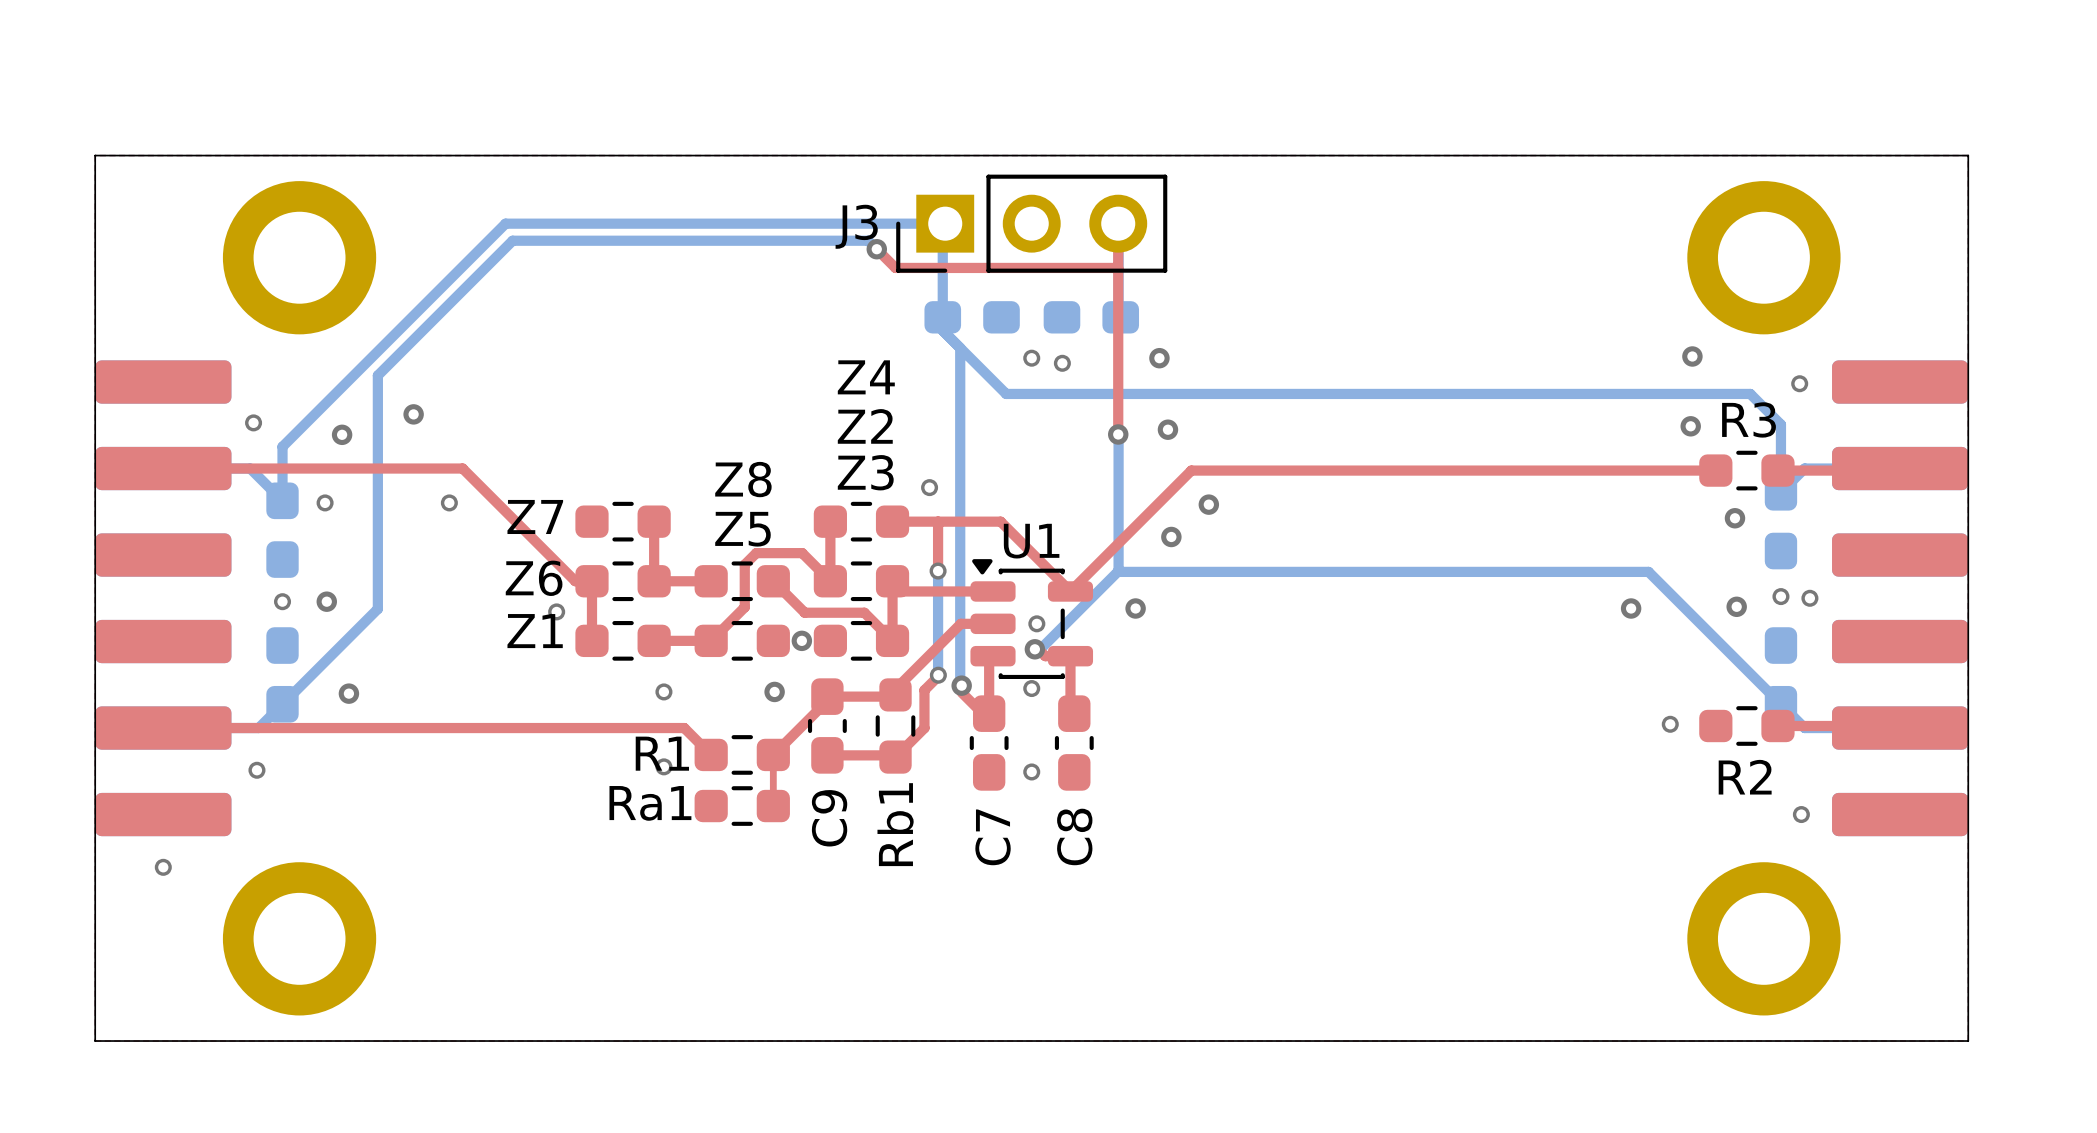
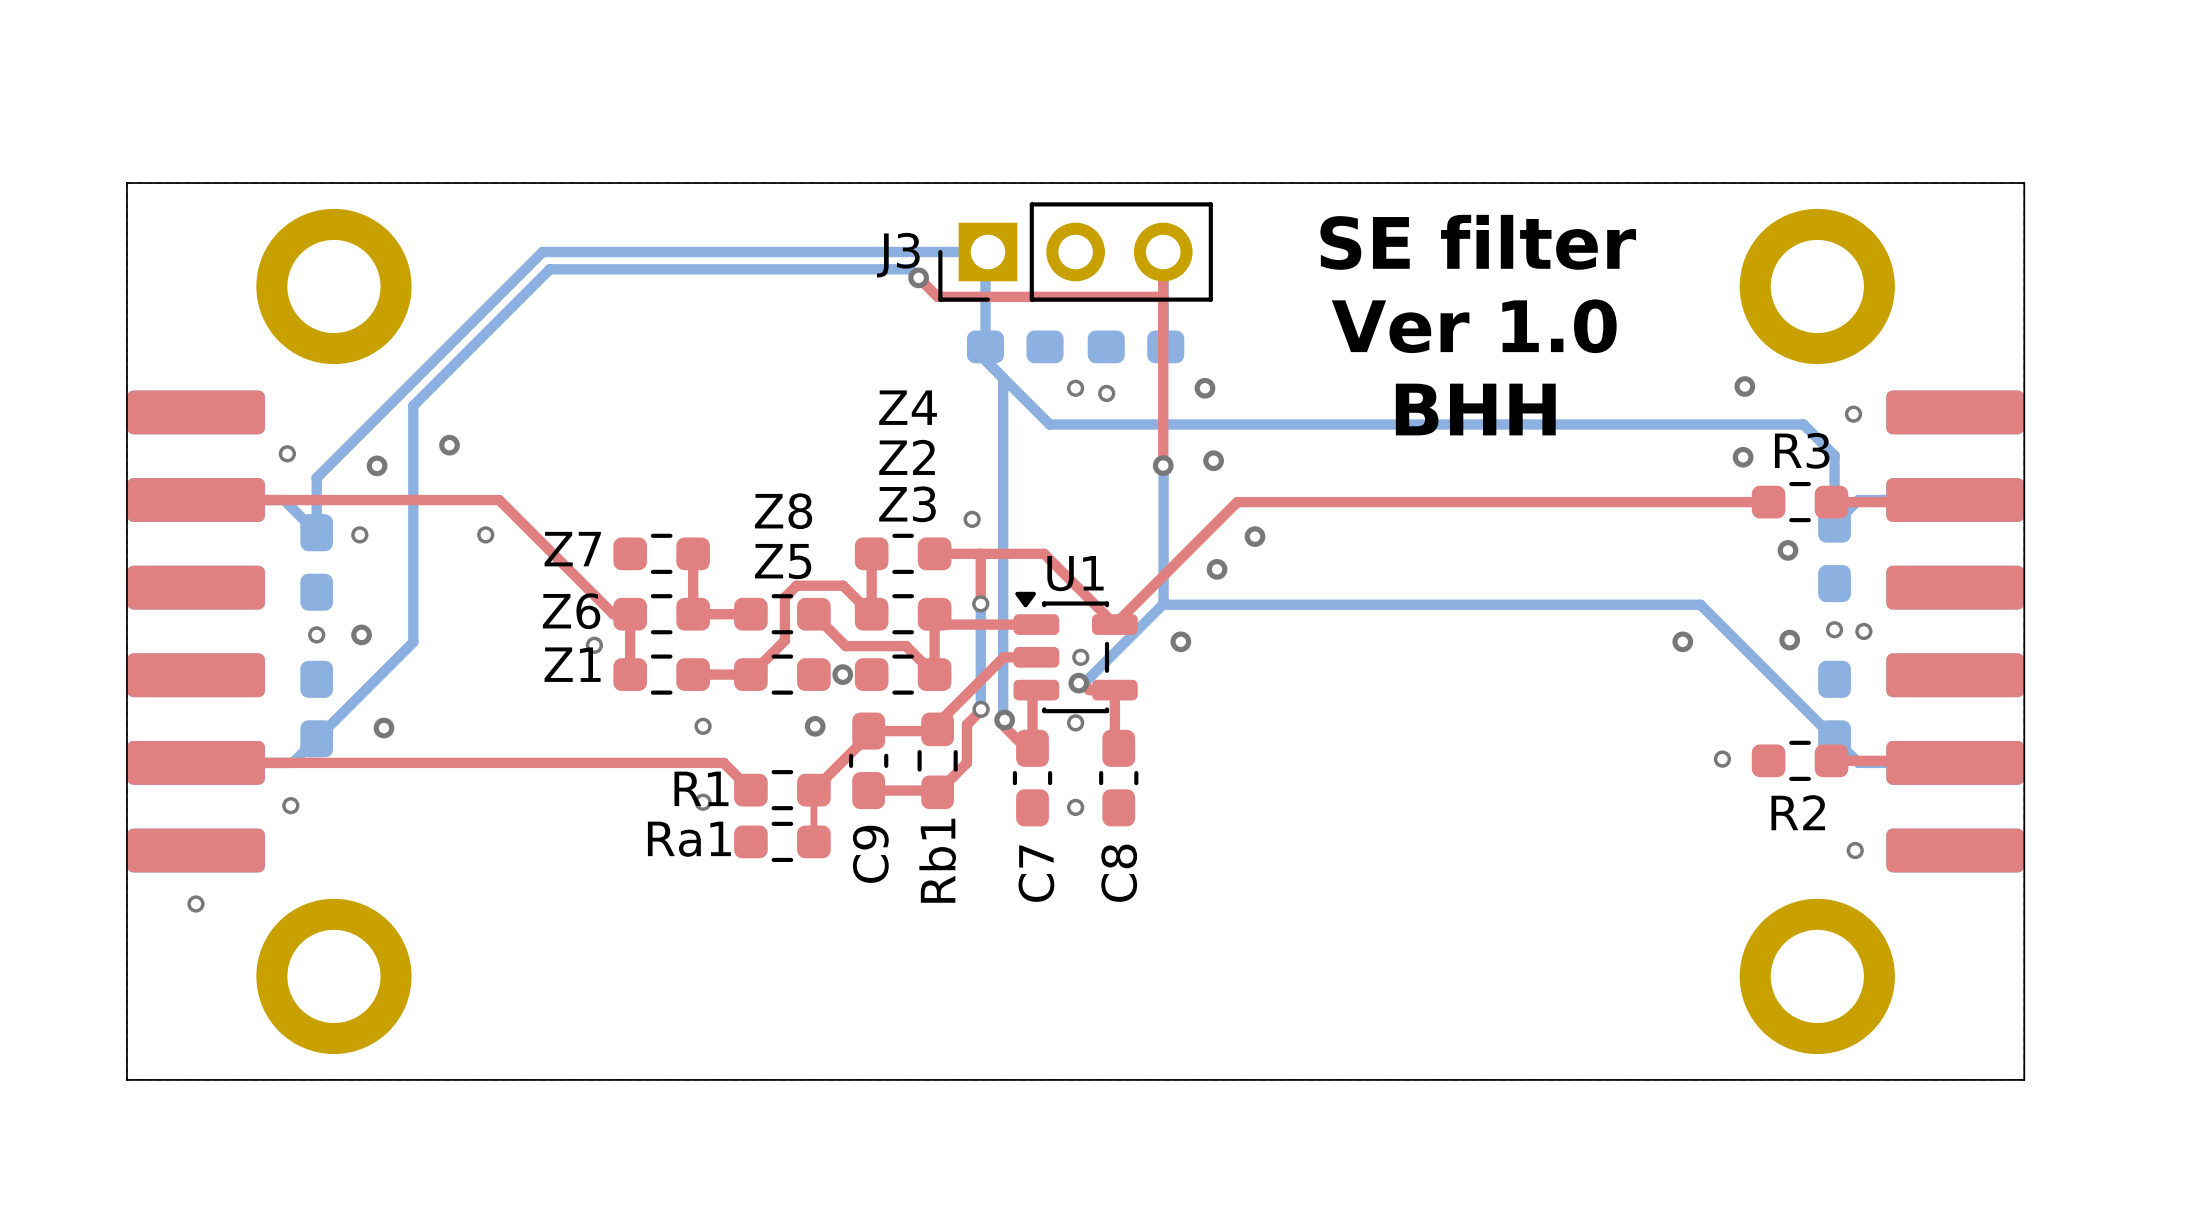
text: none -> SE filter (1478, 242)
text: none -> Ver 1.0 (1474, 326)
text: none -> BHH (1475, 409)

